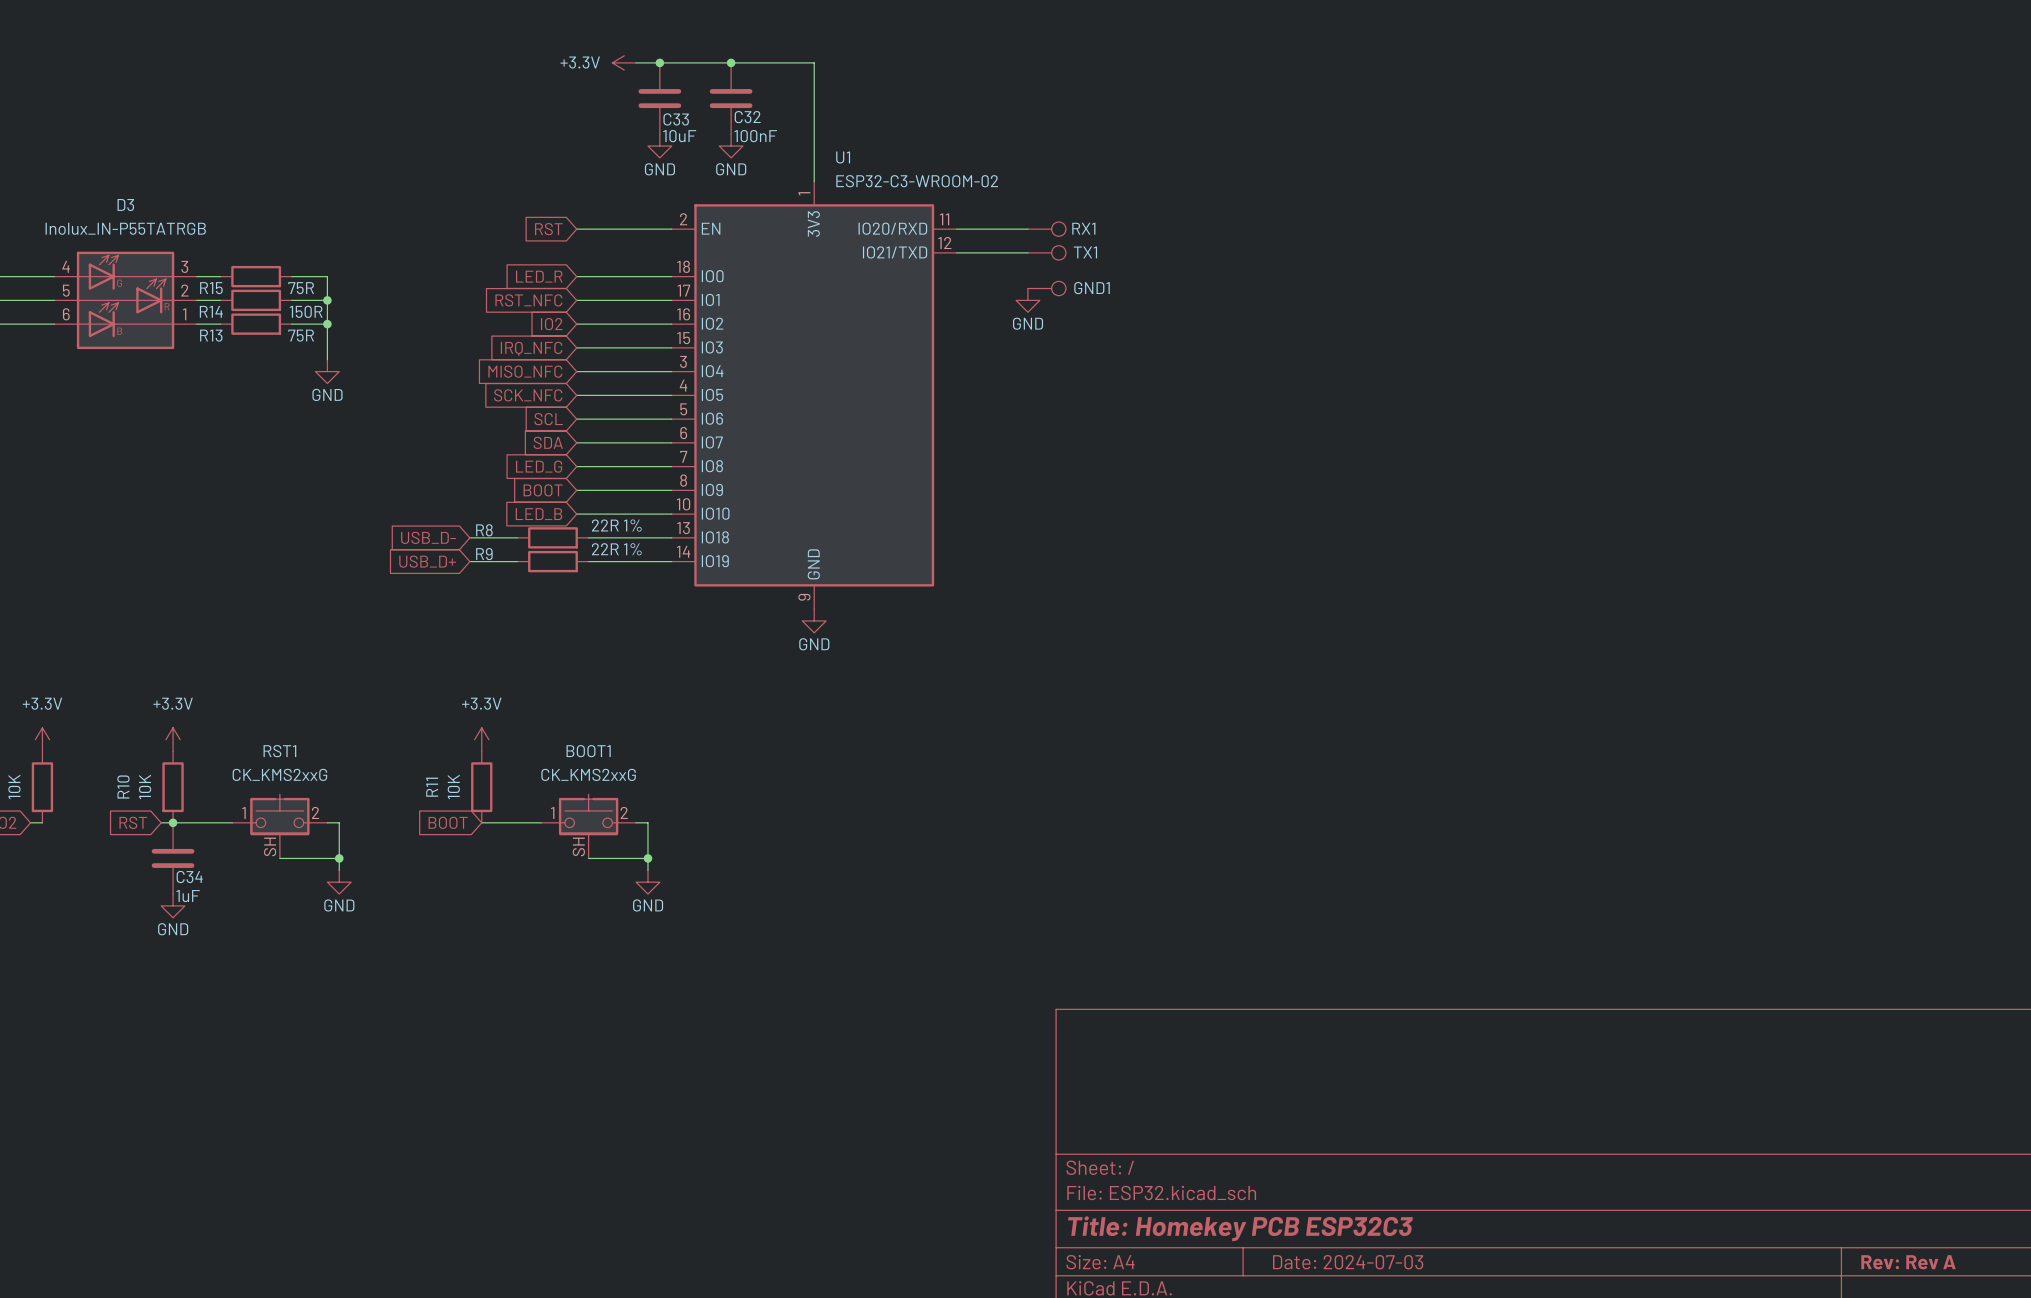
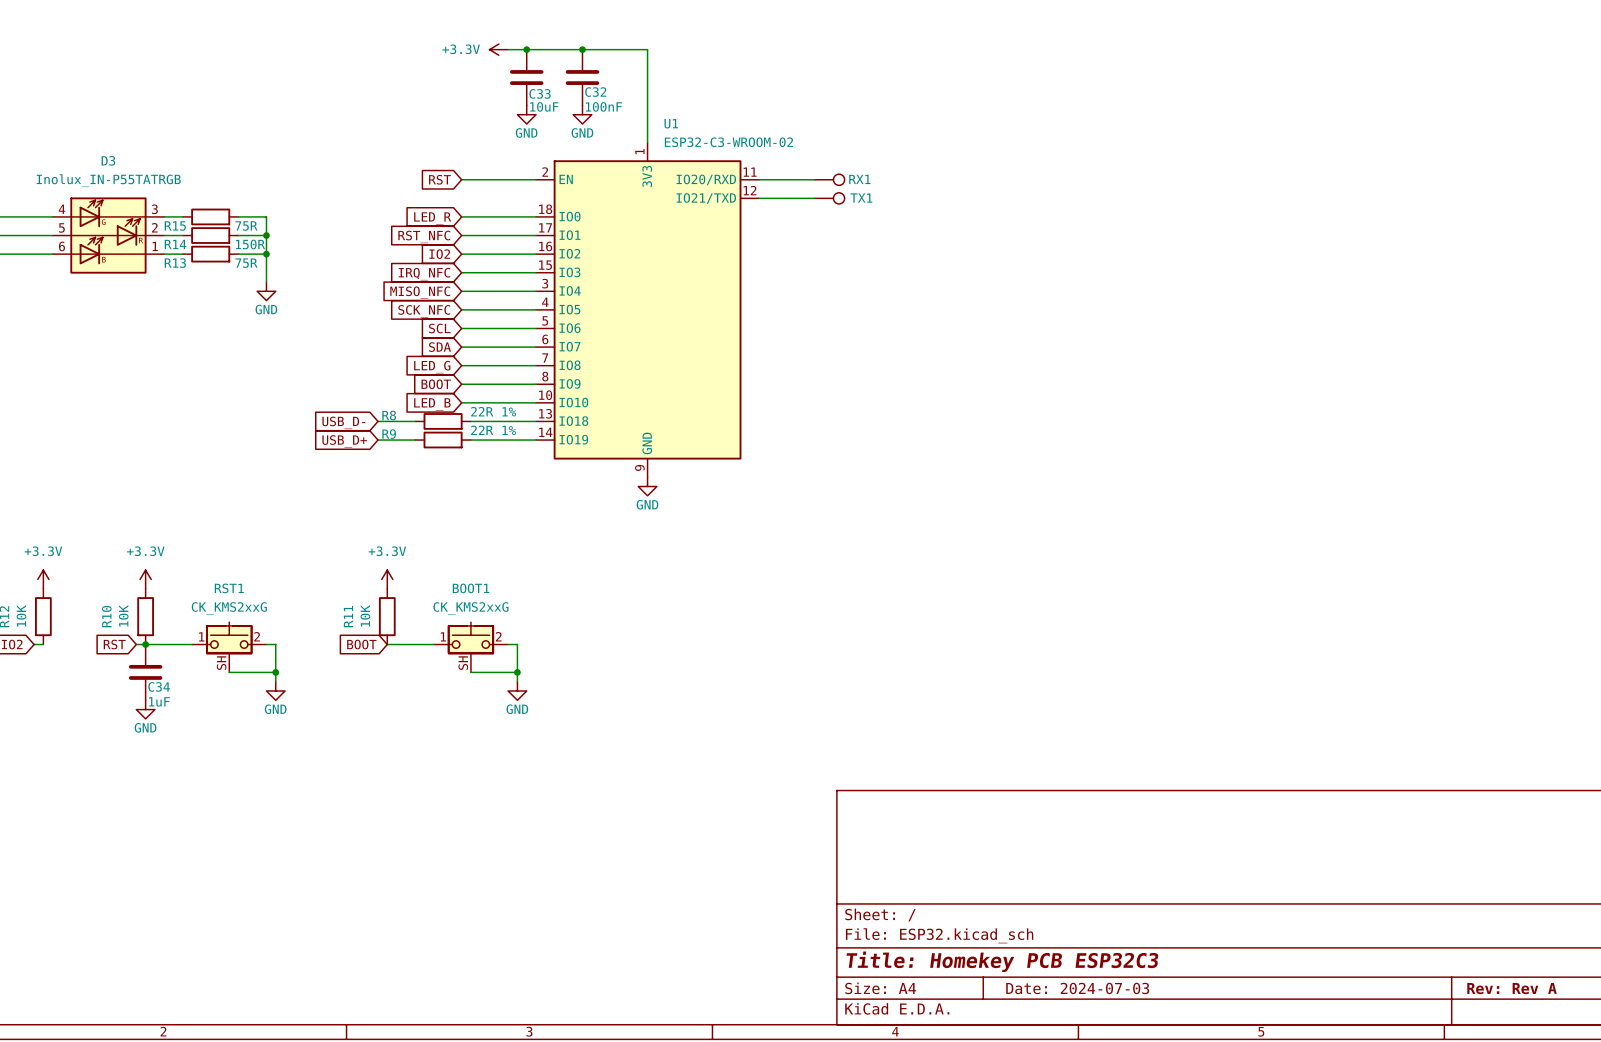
GND1: (1046, 288) -> none
power symbol: GND (1027, 300) -> none

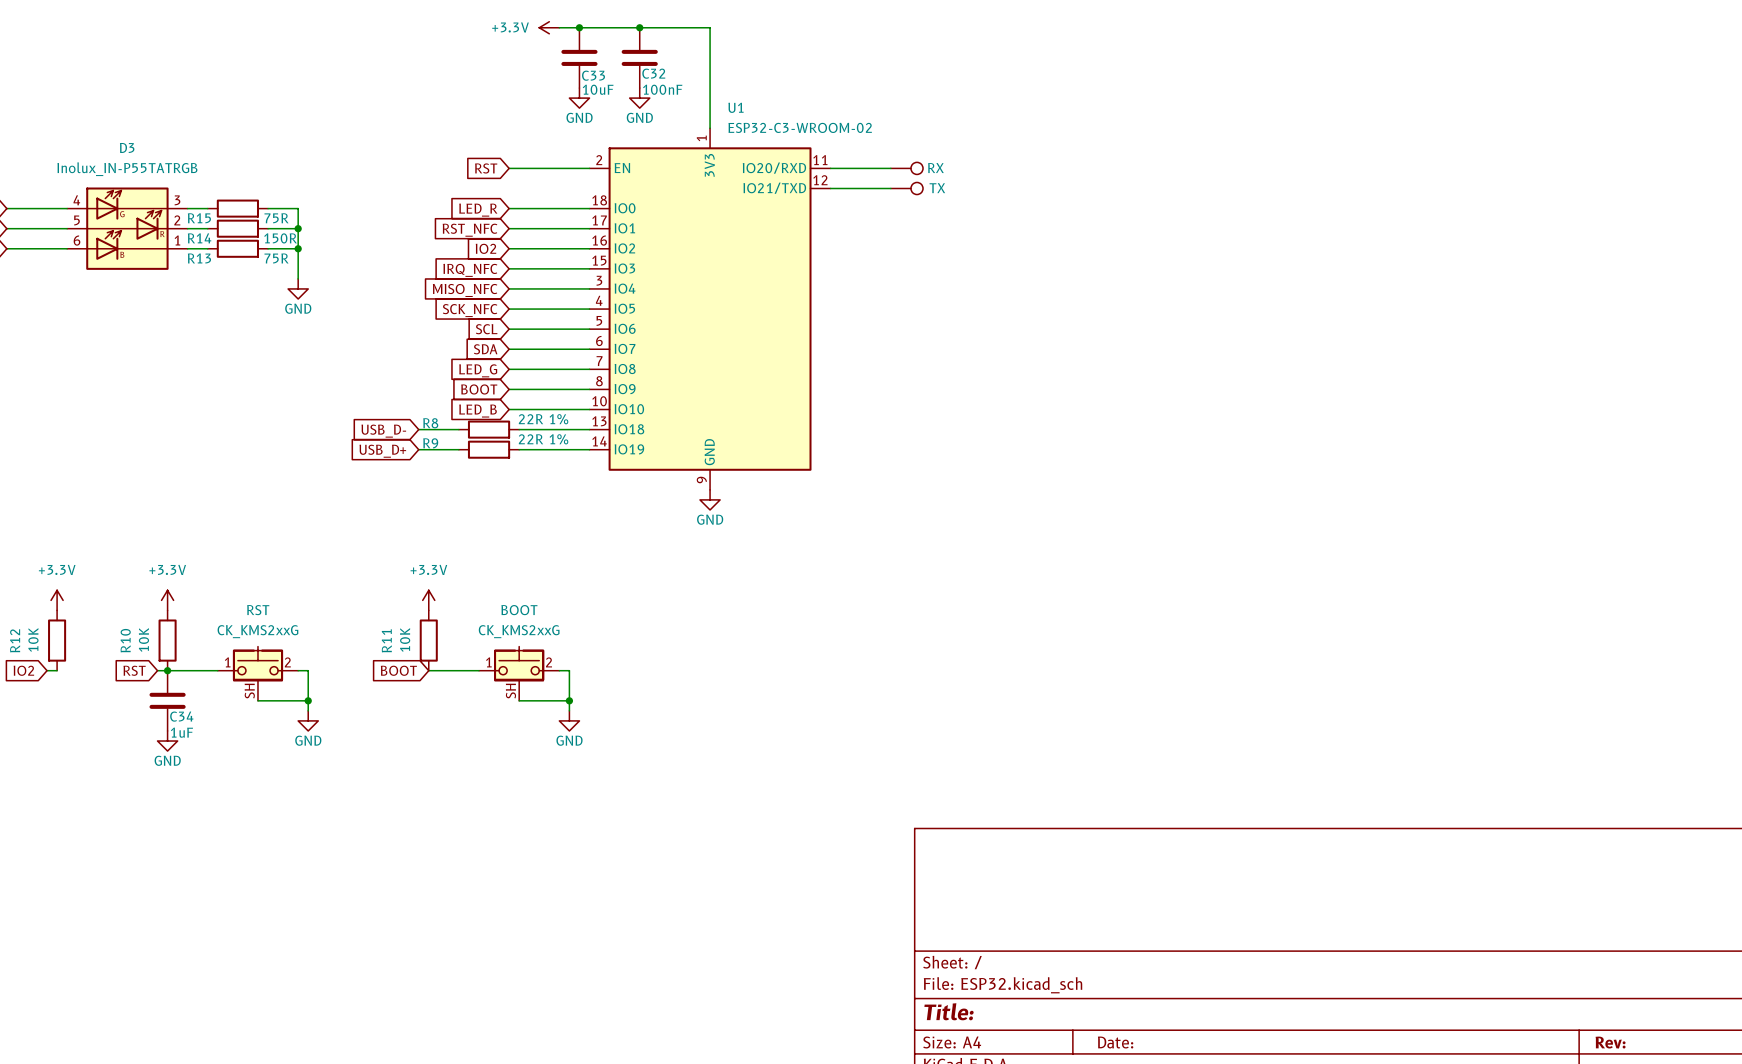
RX1 name: RX1 (859, 179) -> RX (935, 168)
TX1 name: TX1 (861, 198) -> TX (937, 188)
RST1 name: RST1 (229, 588) -> RST (258, 610)
BOOT1 name: BOOT1 (471, 588) -> BOOT (519, 610)
title block: Title: Homekey PCB ESP32C3 (1002, 961) -> Title: (949, 1011)
title block: Date: 2024-07-03 (1077, 988) -> Date: (1115, 1042)
title block: Rev: Rev A (1512, 988) -> Rev: (1610, 1042)

